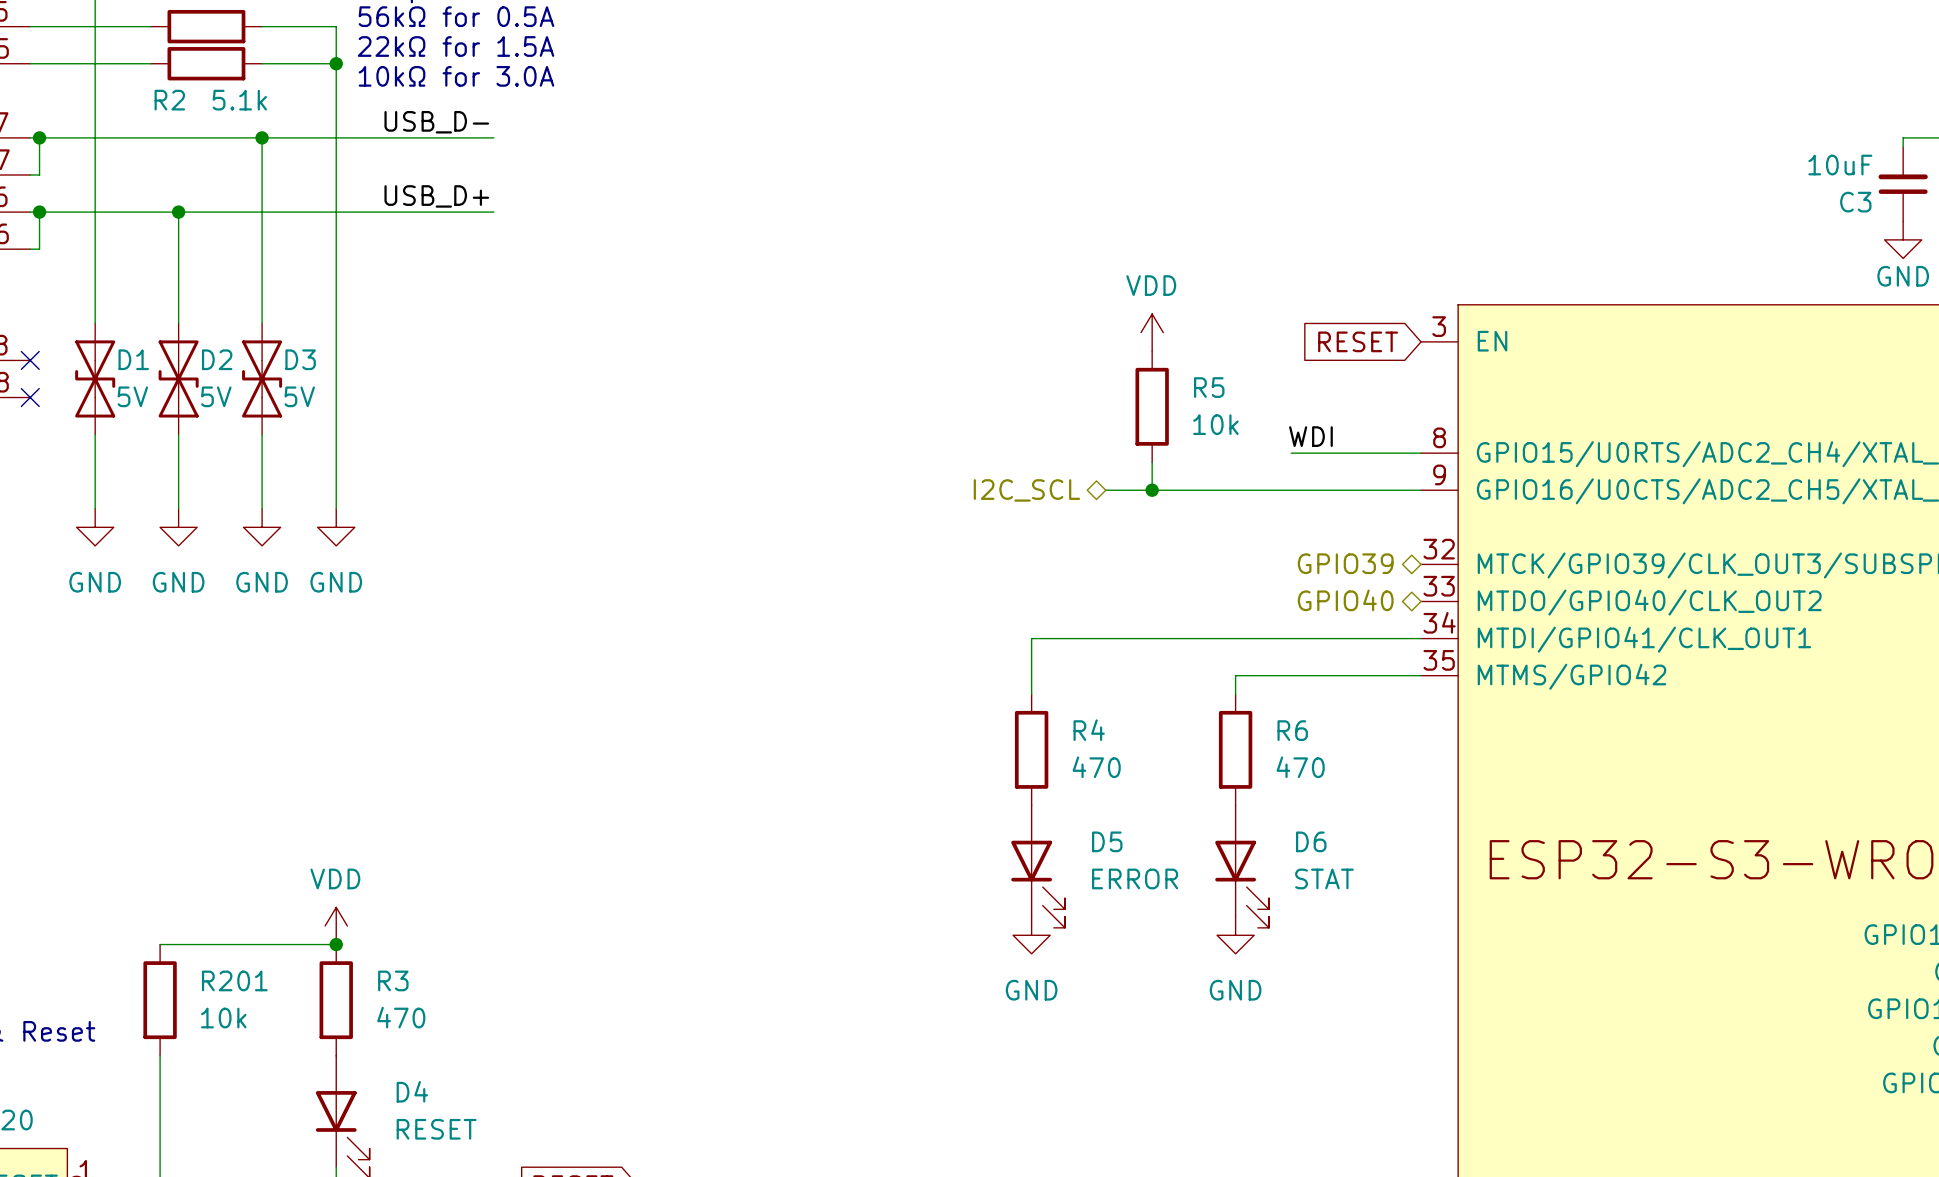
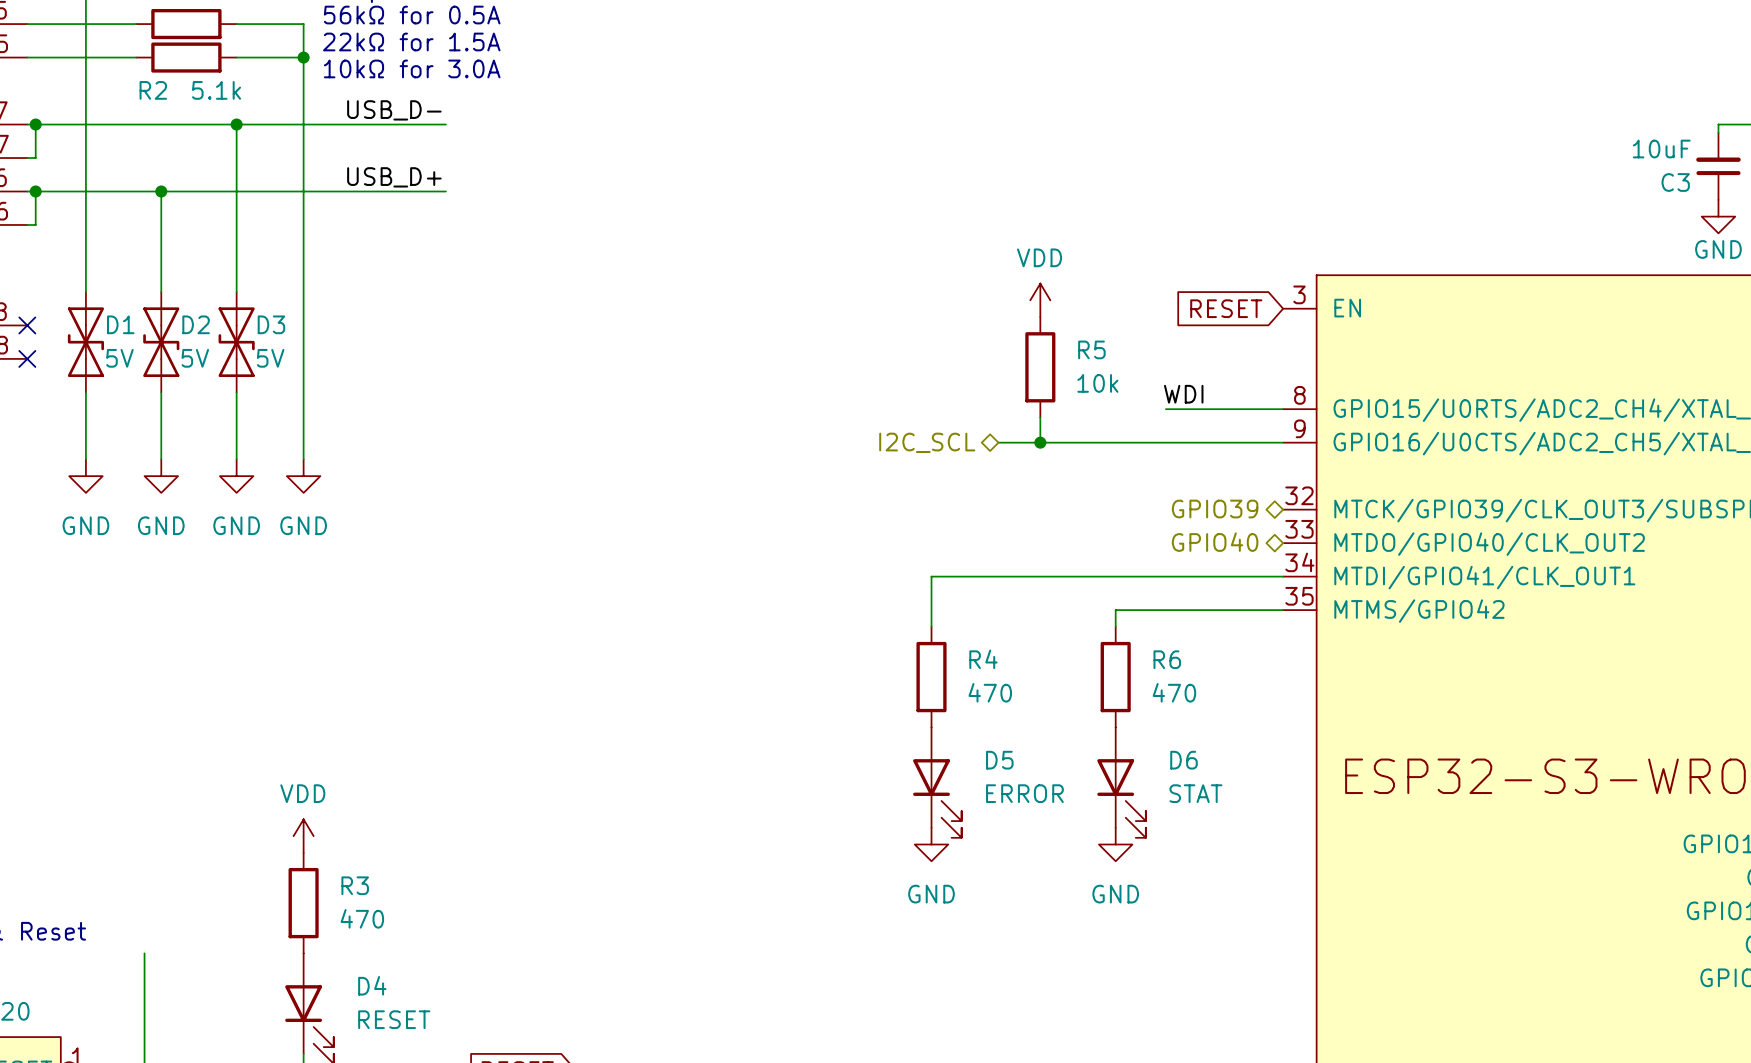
wire: (160, 944) (336, 944) -> none
junction: (336, 944) -> none
R201: 10k (160, 1000) -> none

